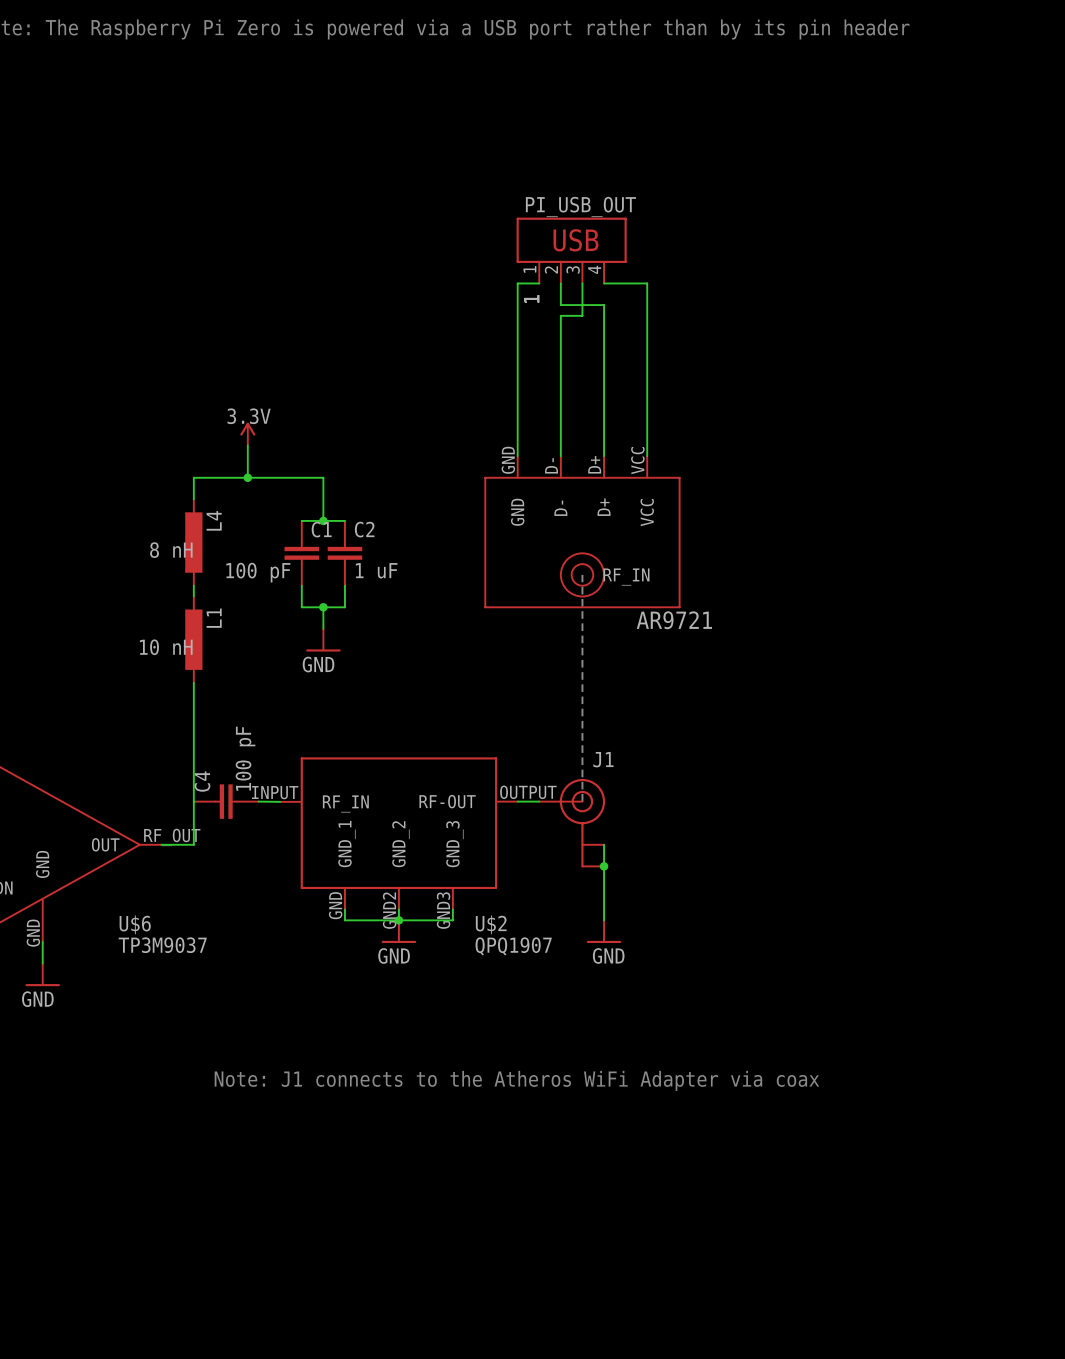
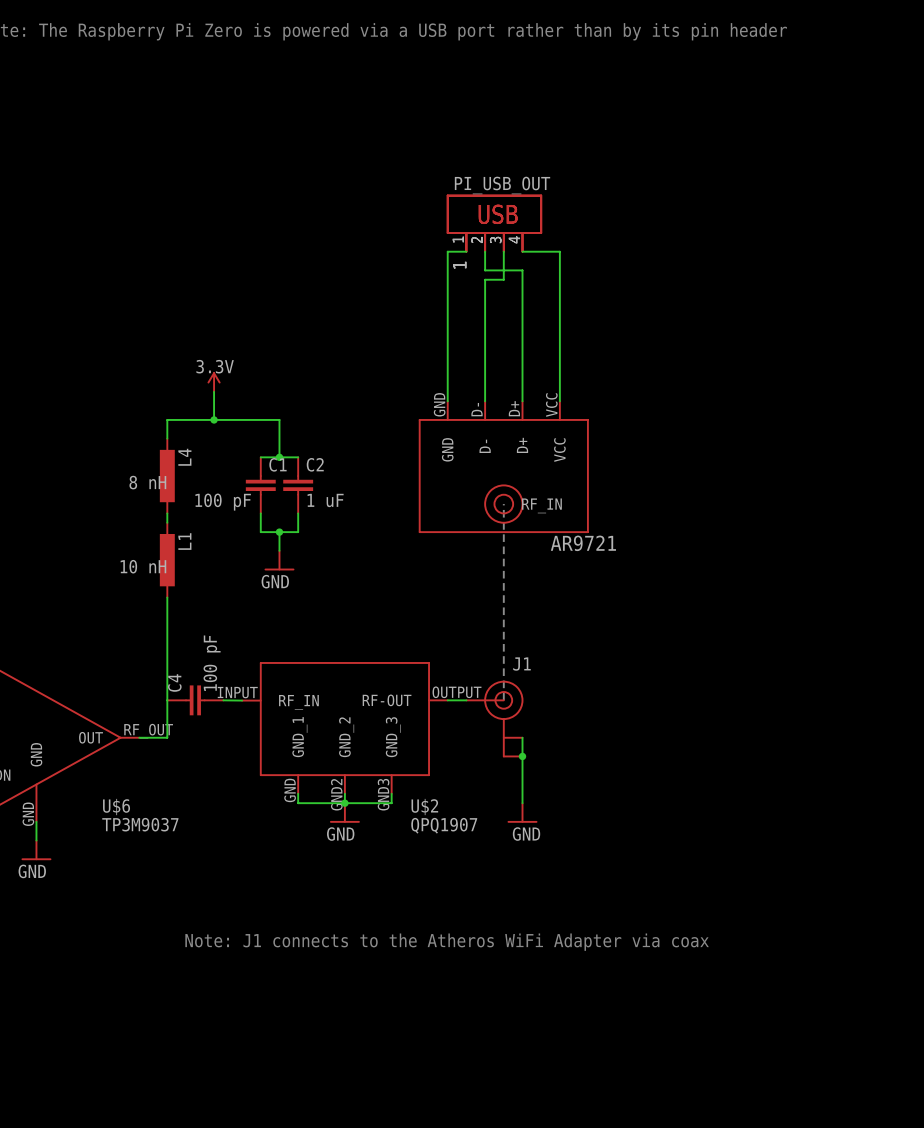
part: none -> (494, 223)

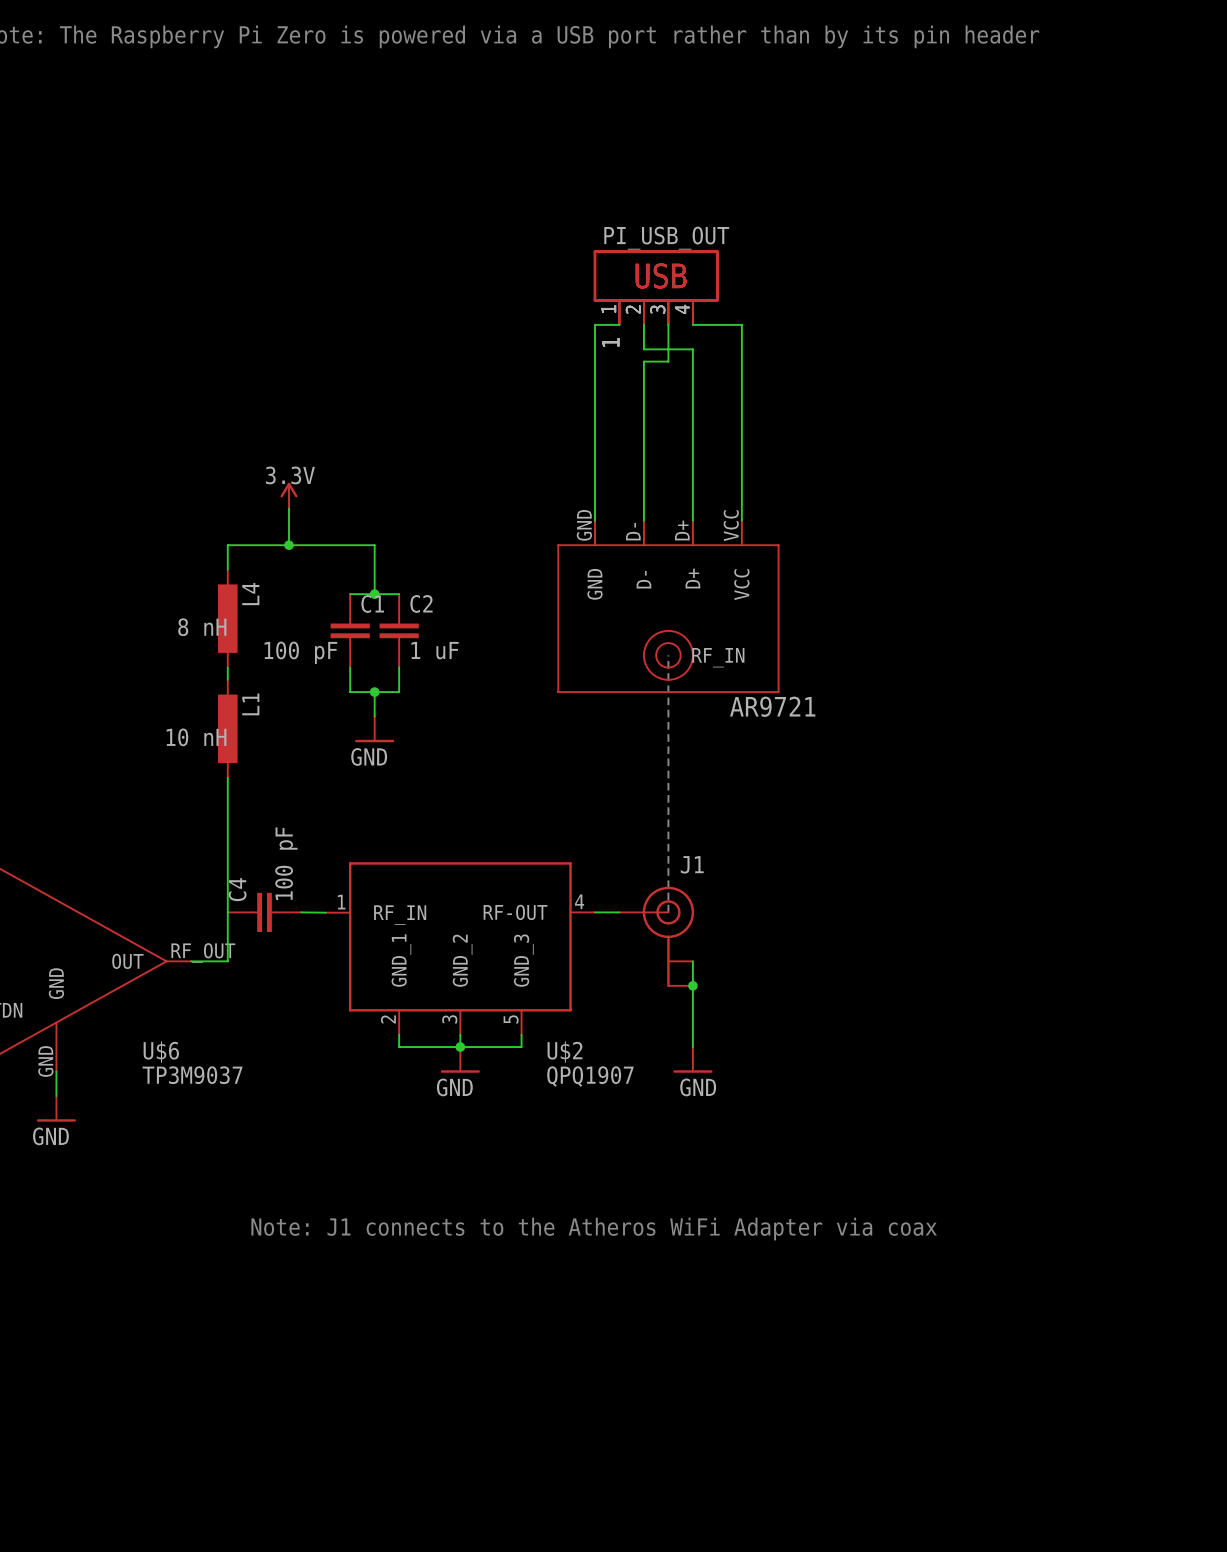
U$2 pin number: INPUT (237, 692) -> 1 (341, 902)
U$2 pin number: OUTPUT (457, 692) -> 4 (579, 901)
U$2 pin number: GND (290, 790) -> 2 (388, 1019)
U$2 pin number: GND2 (336, 794) -> 3 (449, 1019)
U$2 pin number: GND3 (383, 794) -> 5 (511, 1019)

